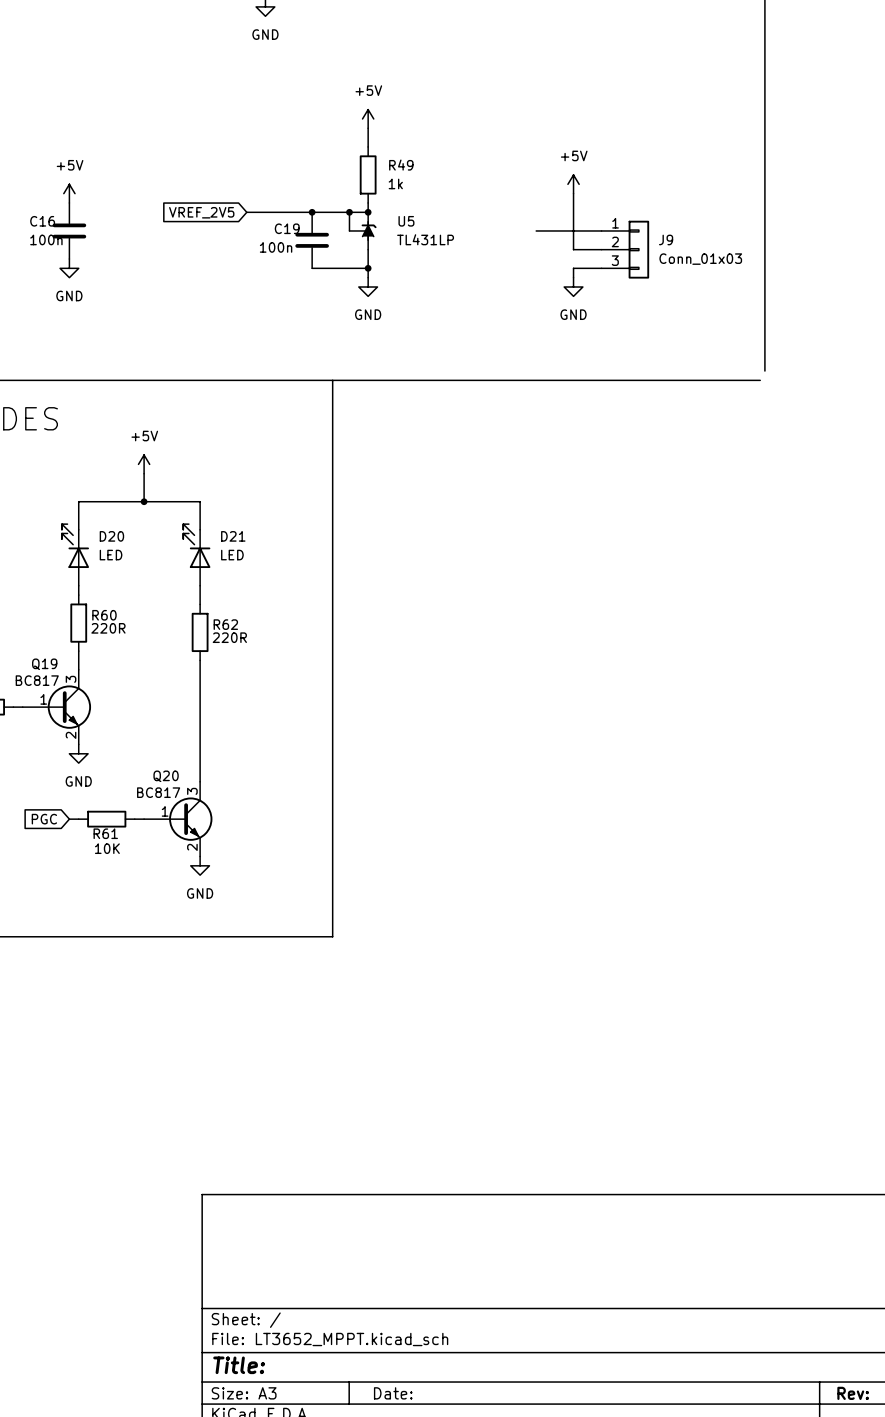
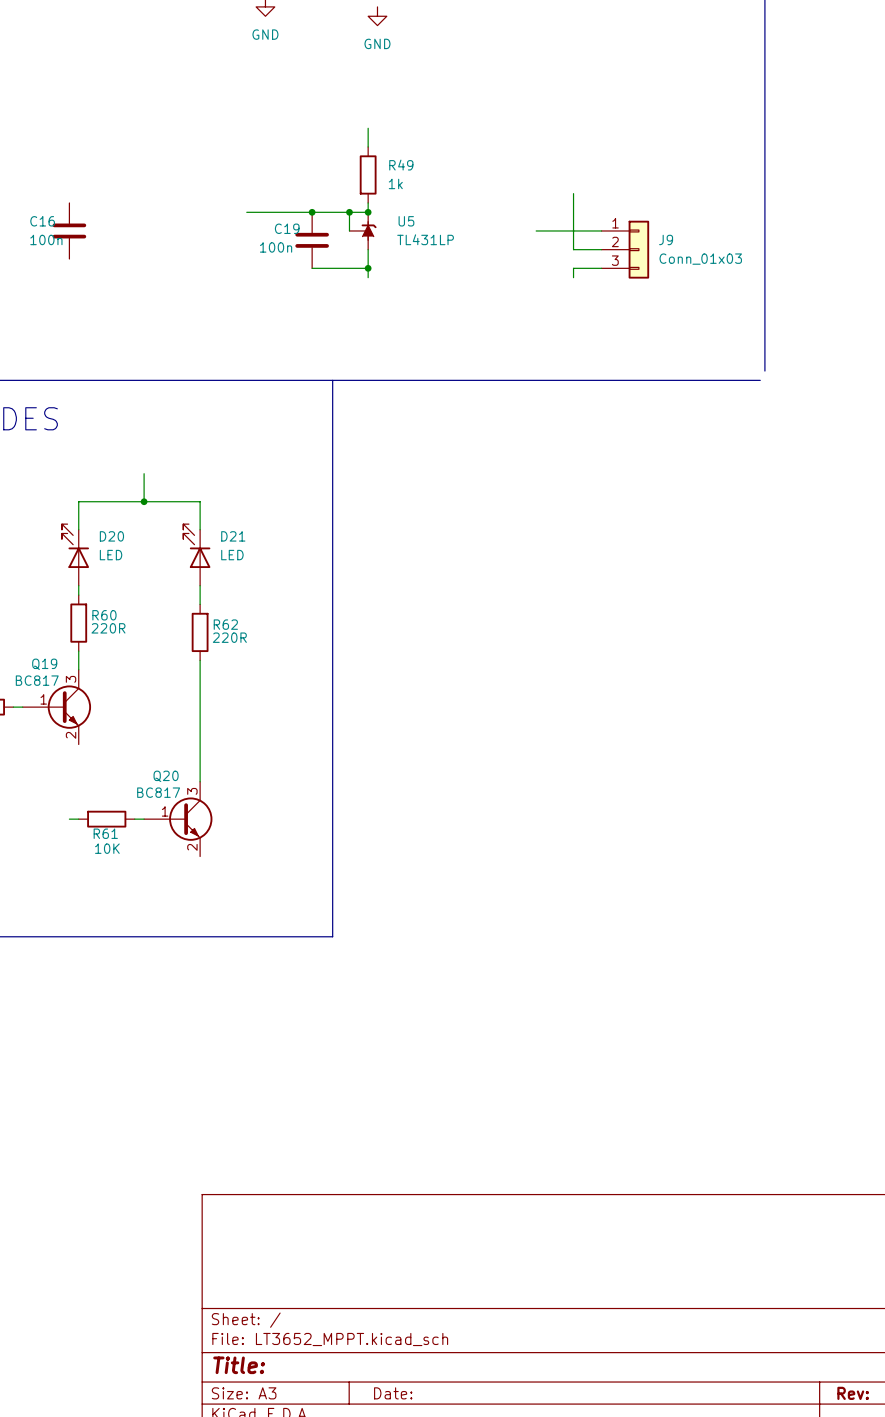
power symbol: none -> GND (377, 16)
power symbol: +5V (368, 118) -> none
power symbol: +5V (573, 184) -> none
power symbol: +5V (69, 193) -> none
global label: VREF_2V5 (201, 212) -> none
power symbol: GND (69, 268) -> none
power symbol: GND (368, 287) -> none
power symbol: GND (573, 287) -> none
power symbol: +5V (144, 464) -> none
power symbol: GND (78, 753) -> none
global label: PGC (44, 819) -> none
power symbol: GND (200, 865) -> none

